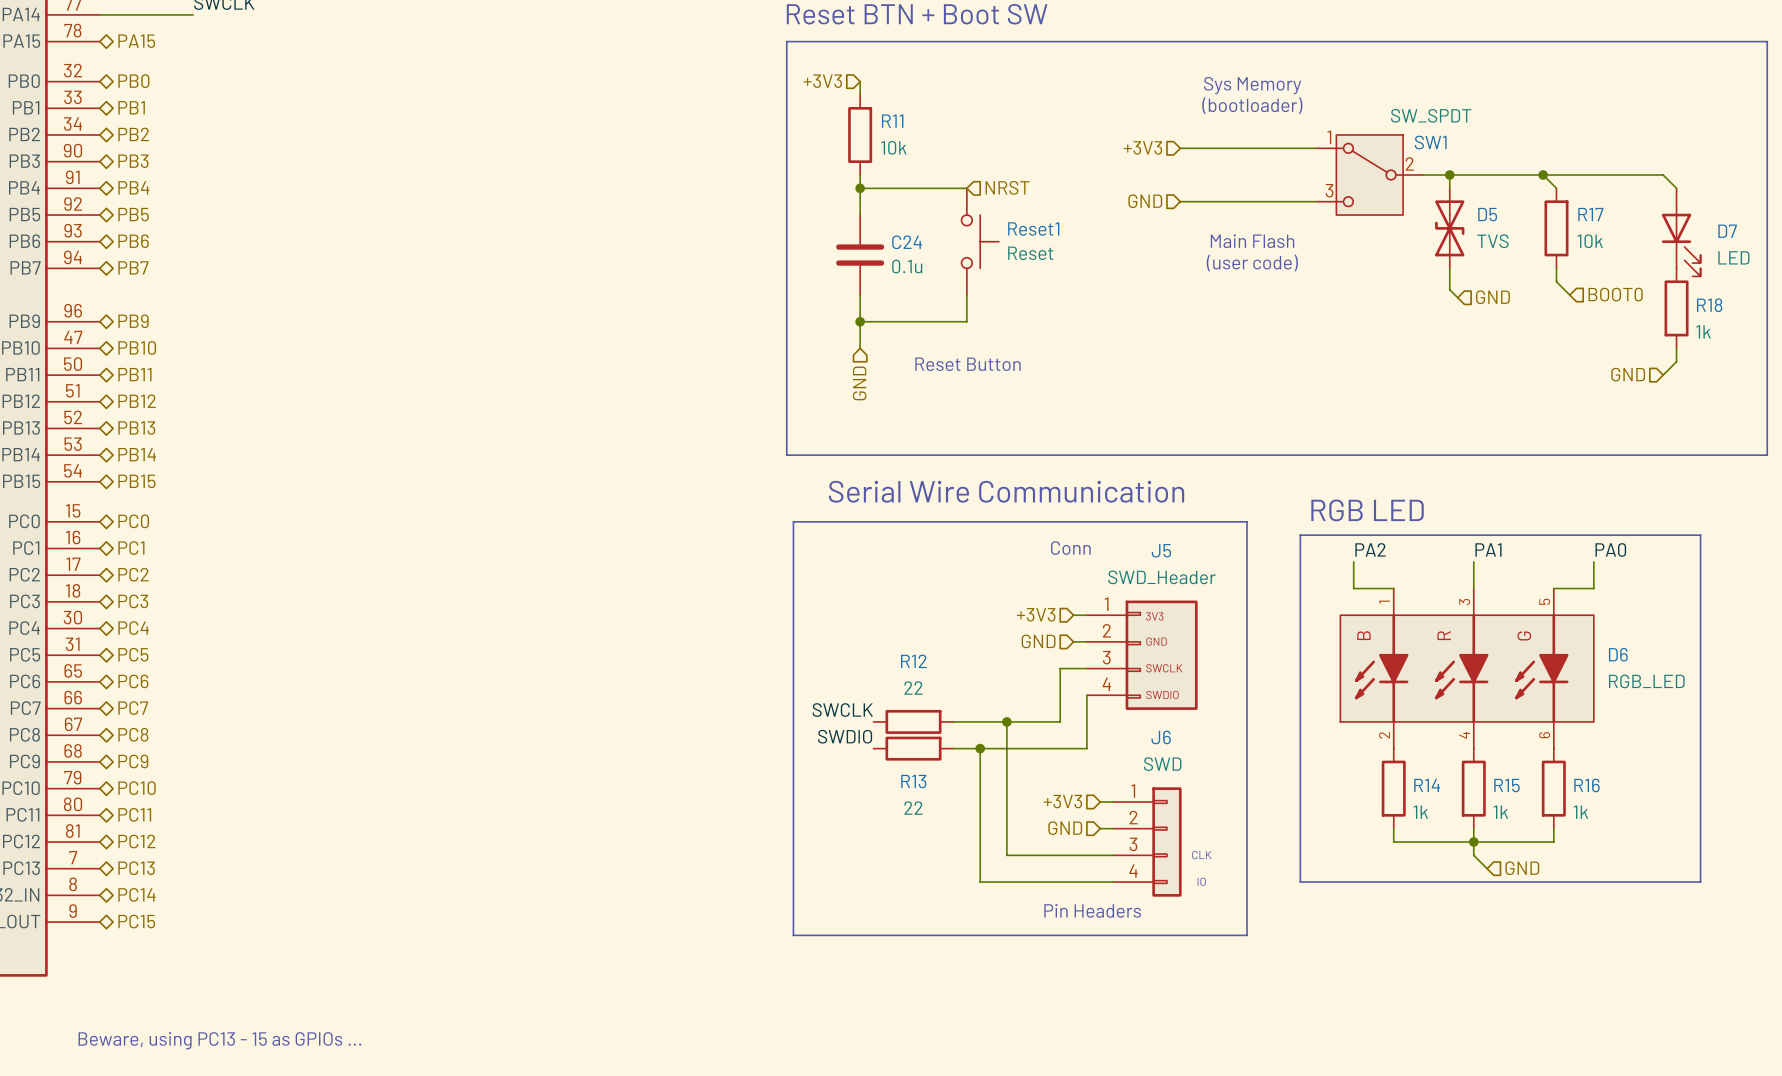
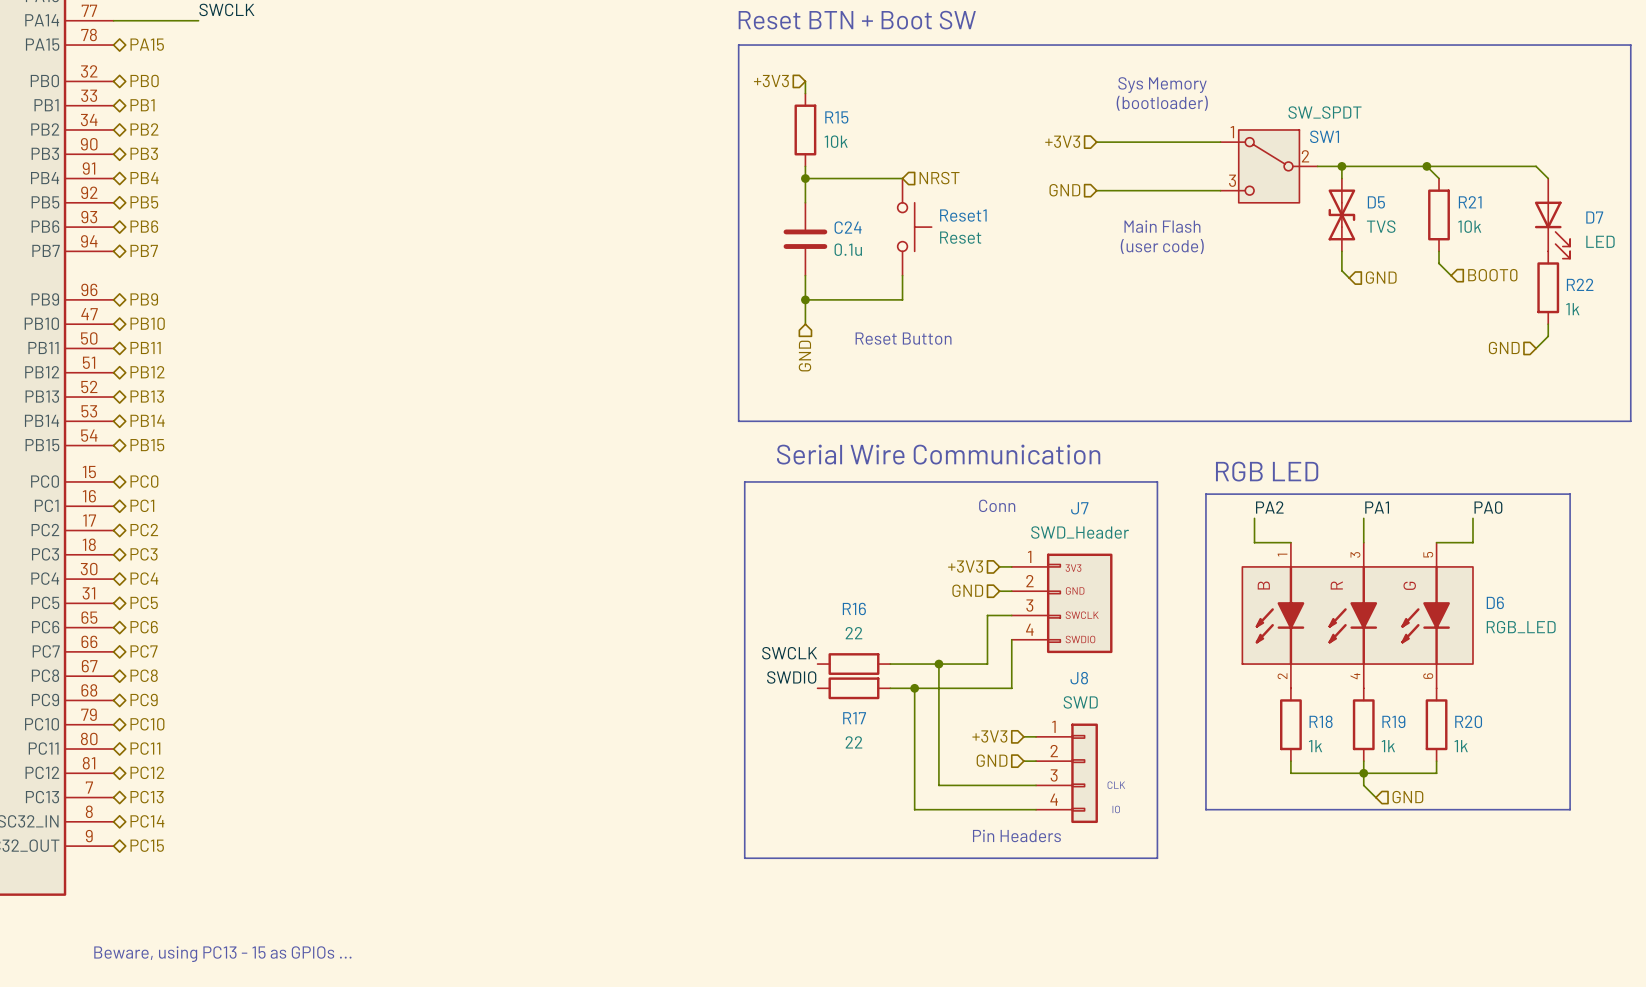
R11 name: R11 (892, 121) -> R15 (836, 117)
R17 name: R17 (1590, 214) -> R21 (1470, 202)
R18 name: R18 (1709, 305) -> R22 (1580, 284)
J5 name: J5 (1161, 550) -> J7 (1079, 508)
R12 name: R12 (913, 661) -> R16 (854, 608)
J6 name: J6 (1161, 737) -> J8 (1079, 678)
R13 name: R13 (913, 781) -> R17 (854, 718)
R14 name: R14 (1427, 785) -> R18 (1321, 721)
R15 name: R15 (1506, 785) -> R19 (1393, 721)
R16 name: R16 (1586, 785) -> R20 (1468, 721)

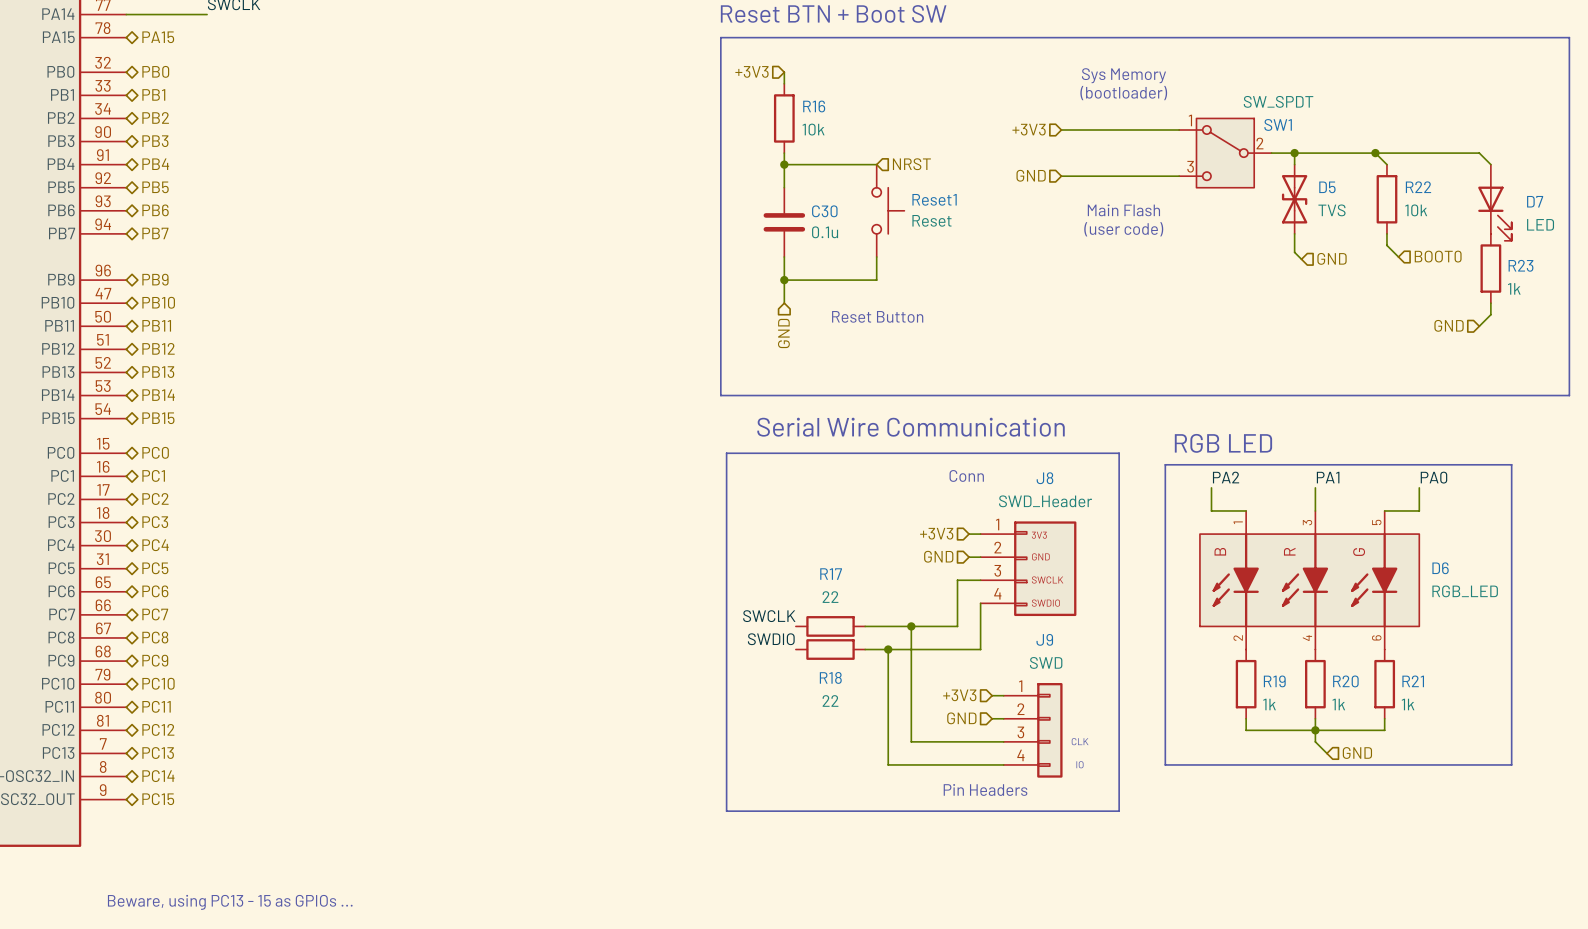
R15 name: R15 (836, 117) -> R16 (814, 106)
R21 name: R21 (1470, 202) -> R22 (1418, 187)
C24 name: C24 (848, 227) -> C30 (824, 211)
R22 name: R22 (1580, 284) -> R23 (1521, 265)
J7 name: J7 (1079, 508) -> J8 (1044, 478)
R16 name: R16 (854, 608) -> R17 (831, 574)
J8 name: J8 (1079, 678) -> J9 (1044, 639)
R17 name: R17 (854, 718) -> R18 (830, 677)
R18 name: R18 (1321, 721) -> R19 (1274, 681)
R19 name: R19 (1393, 721) -> R20 (1345, 681)
R20 name: R20 (1468, 721) -> R21 (1413, 681)

